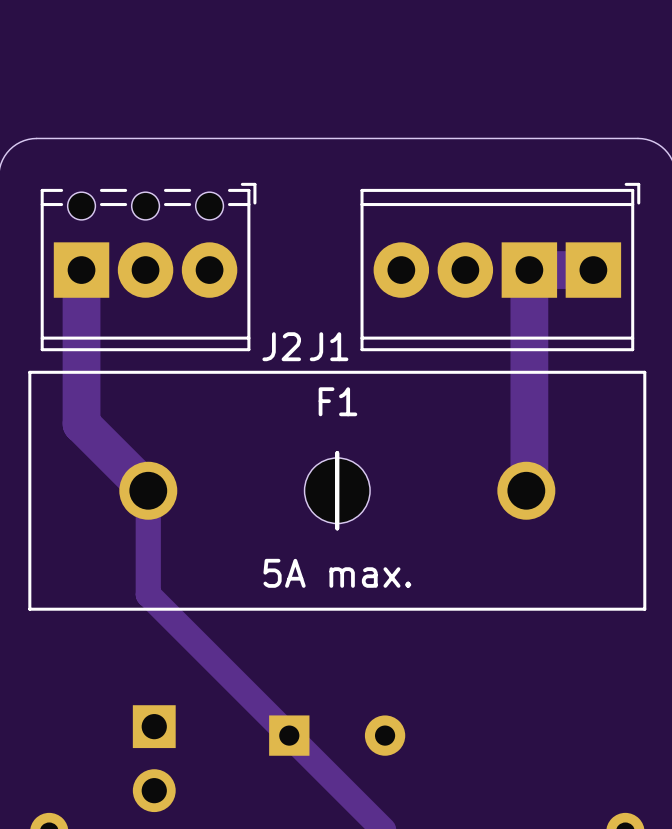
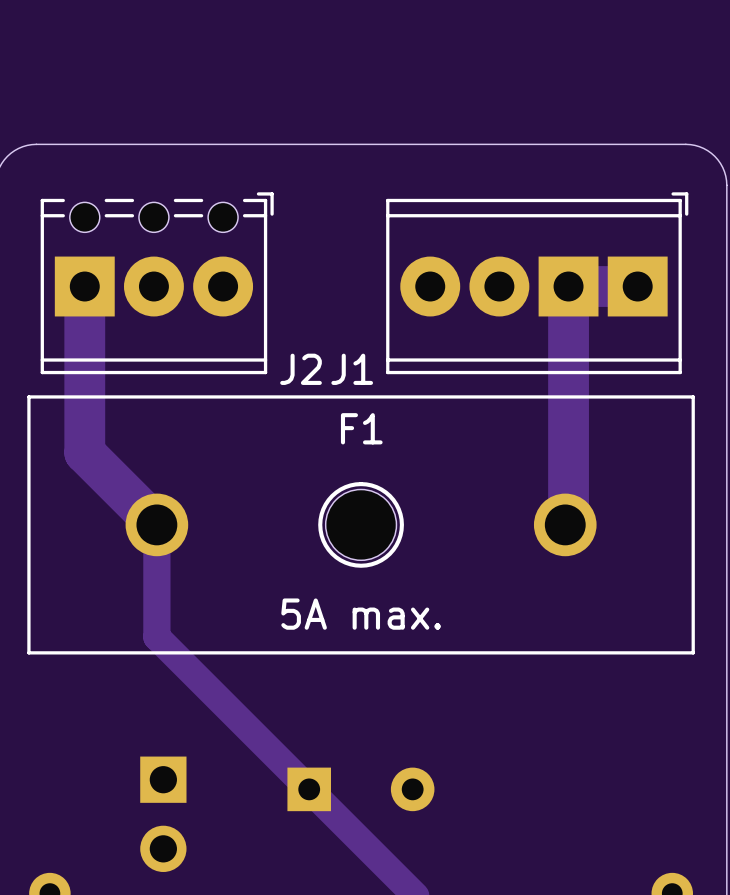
F1 footprint: [28, 370, 647, 611] -> [27, 395, 695, 655]

